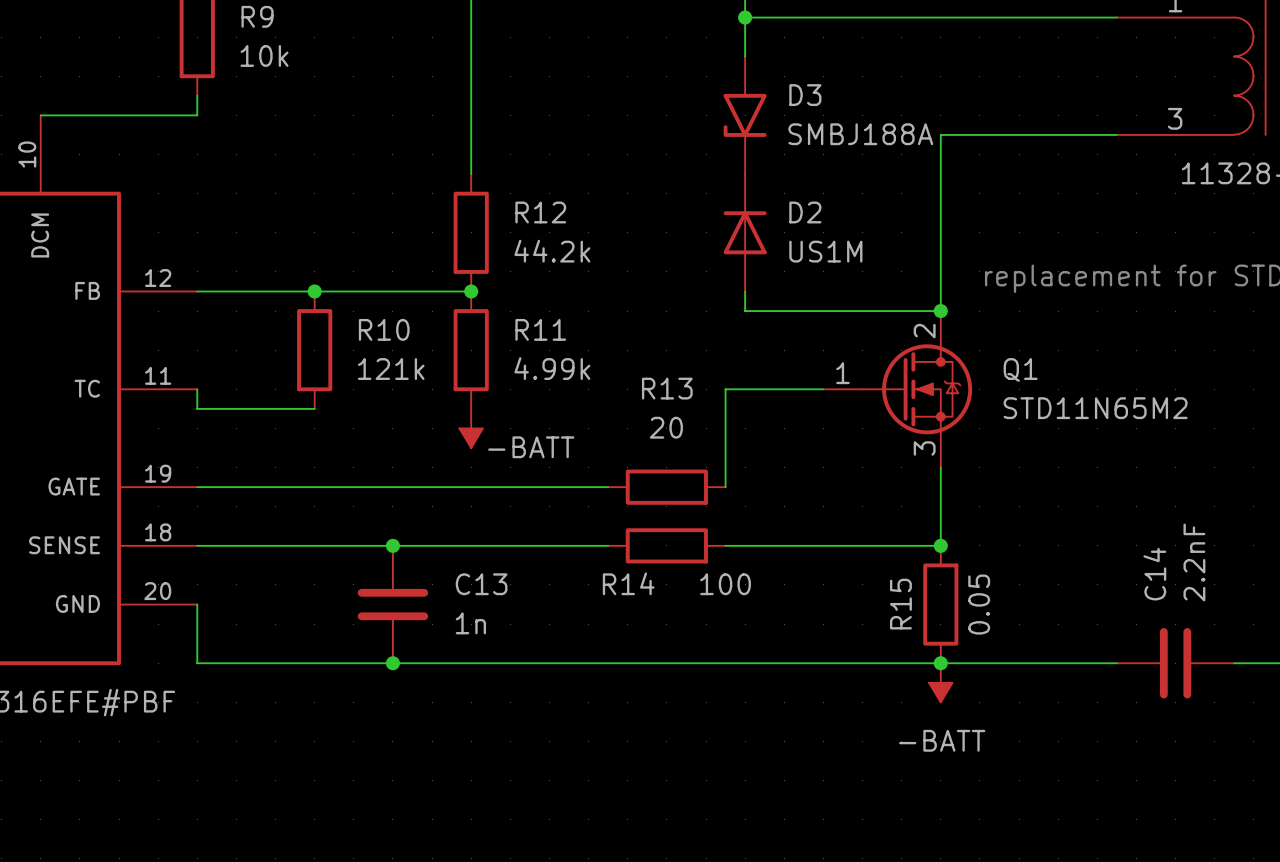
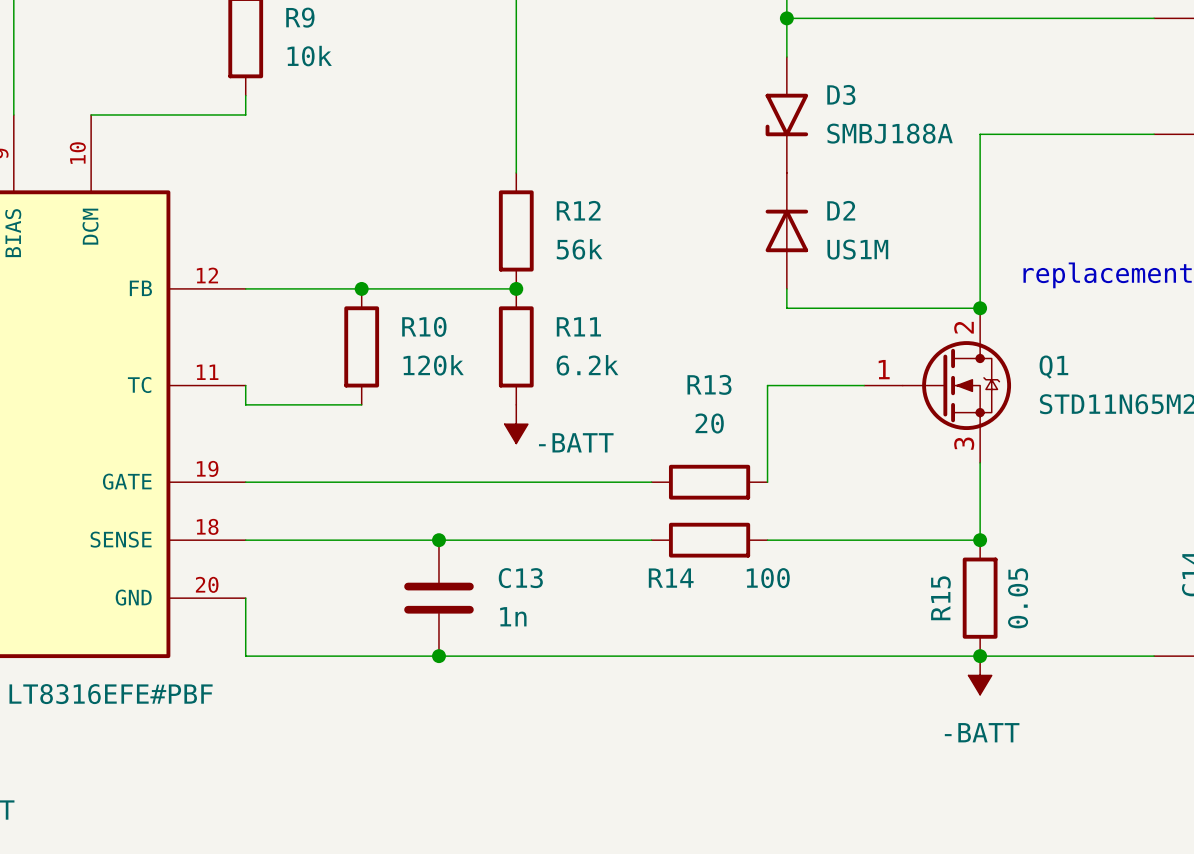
R12 value: 44.2k (552, 251) -> 56k (579, 249)
R11 value: 4.99k (552, 368) -> 6.2k (587, 365)
R10 value: 121k (391, 369) -> 120k (433, 365)

